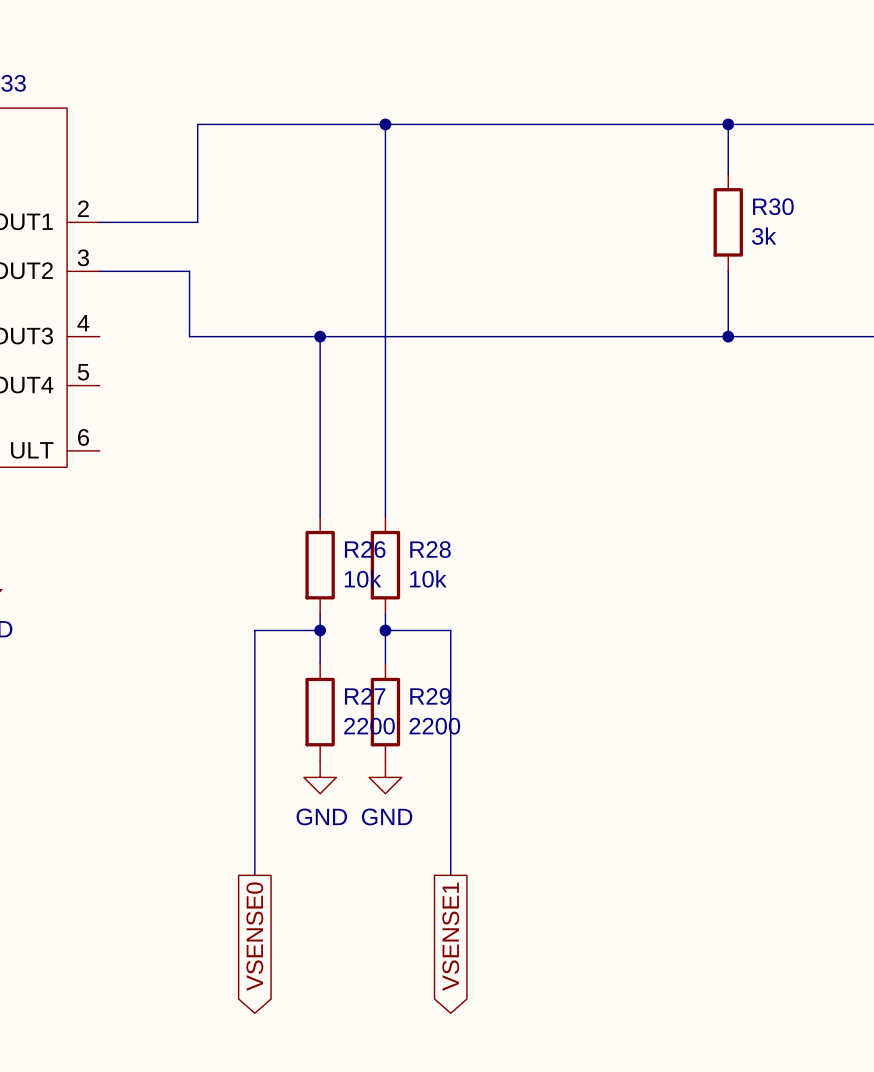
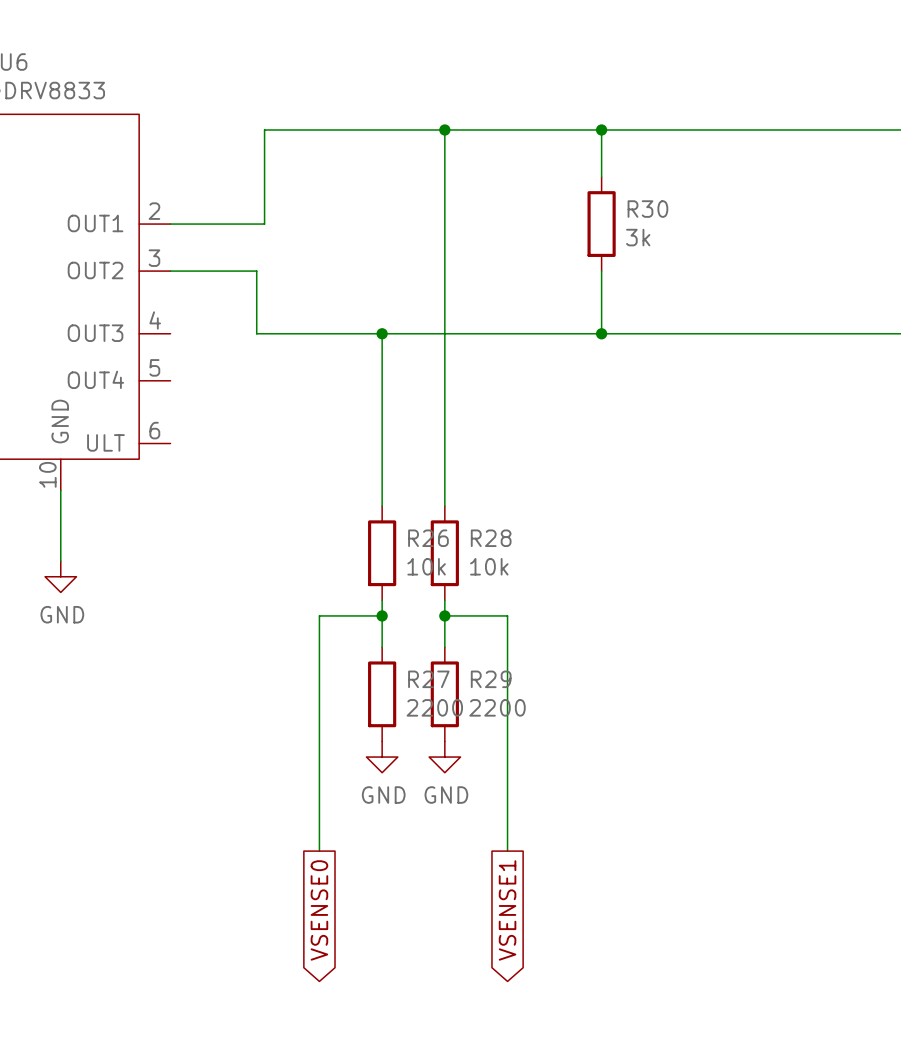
junction: none -> (601, 129)
wire: (728, 124) (728, 173) -> (601, 129) (601, 177)
junction: (728, 124) -> none
R30 position: (728, 222) -> (601, 224)
wire: (728, 271) (728, 336) -> (601, 271) (601, 333)
junction: none -> (601, 333)
junction: (728, 336) -> none

